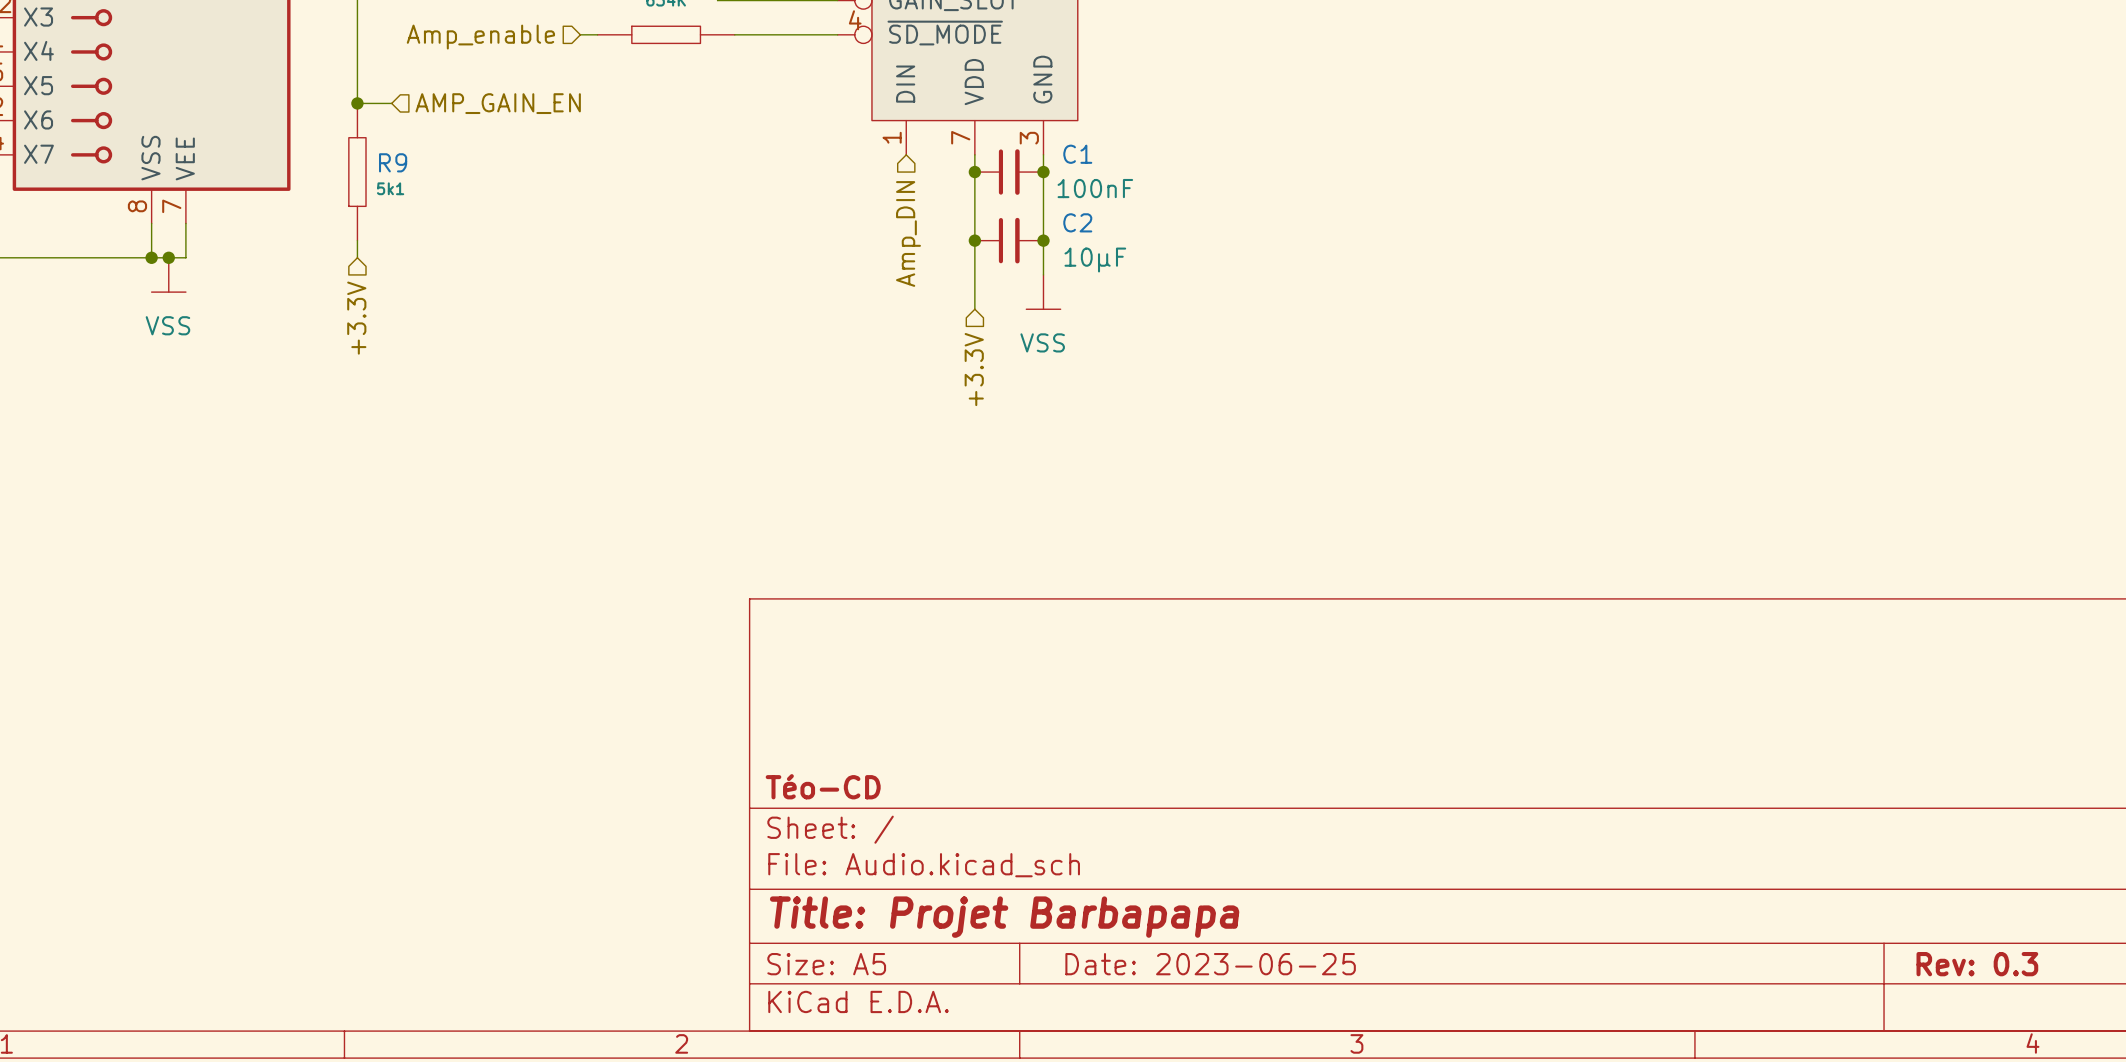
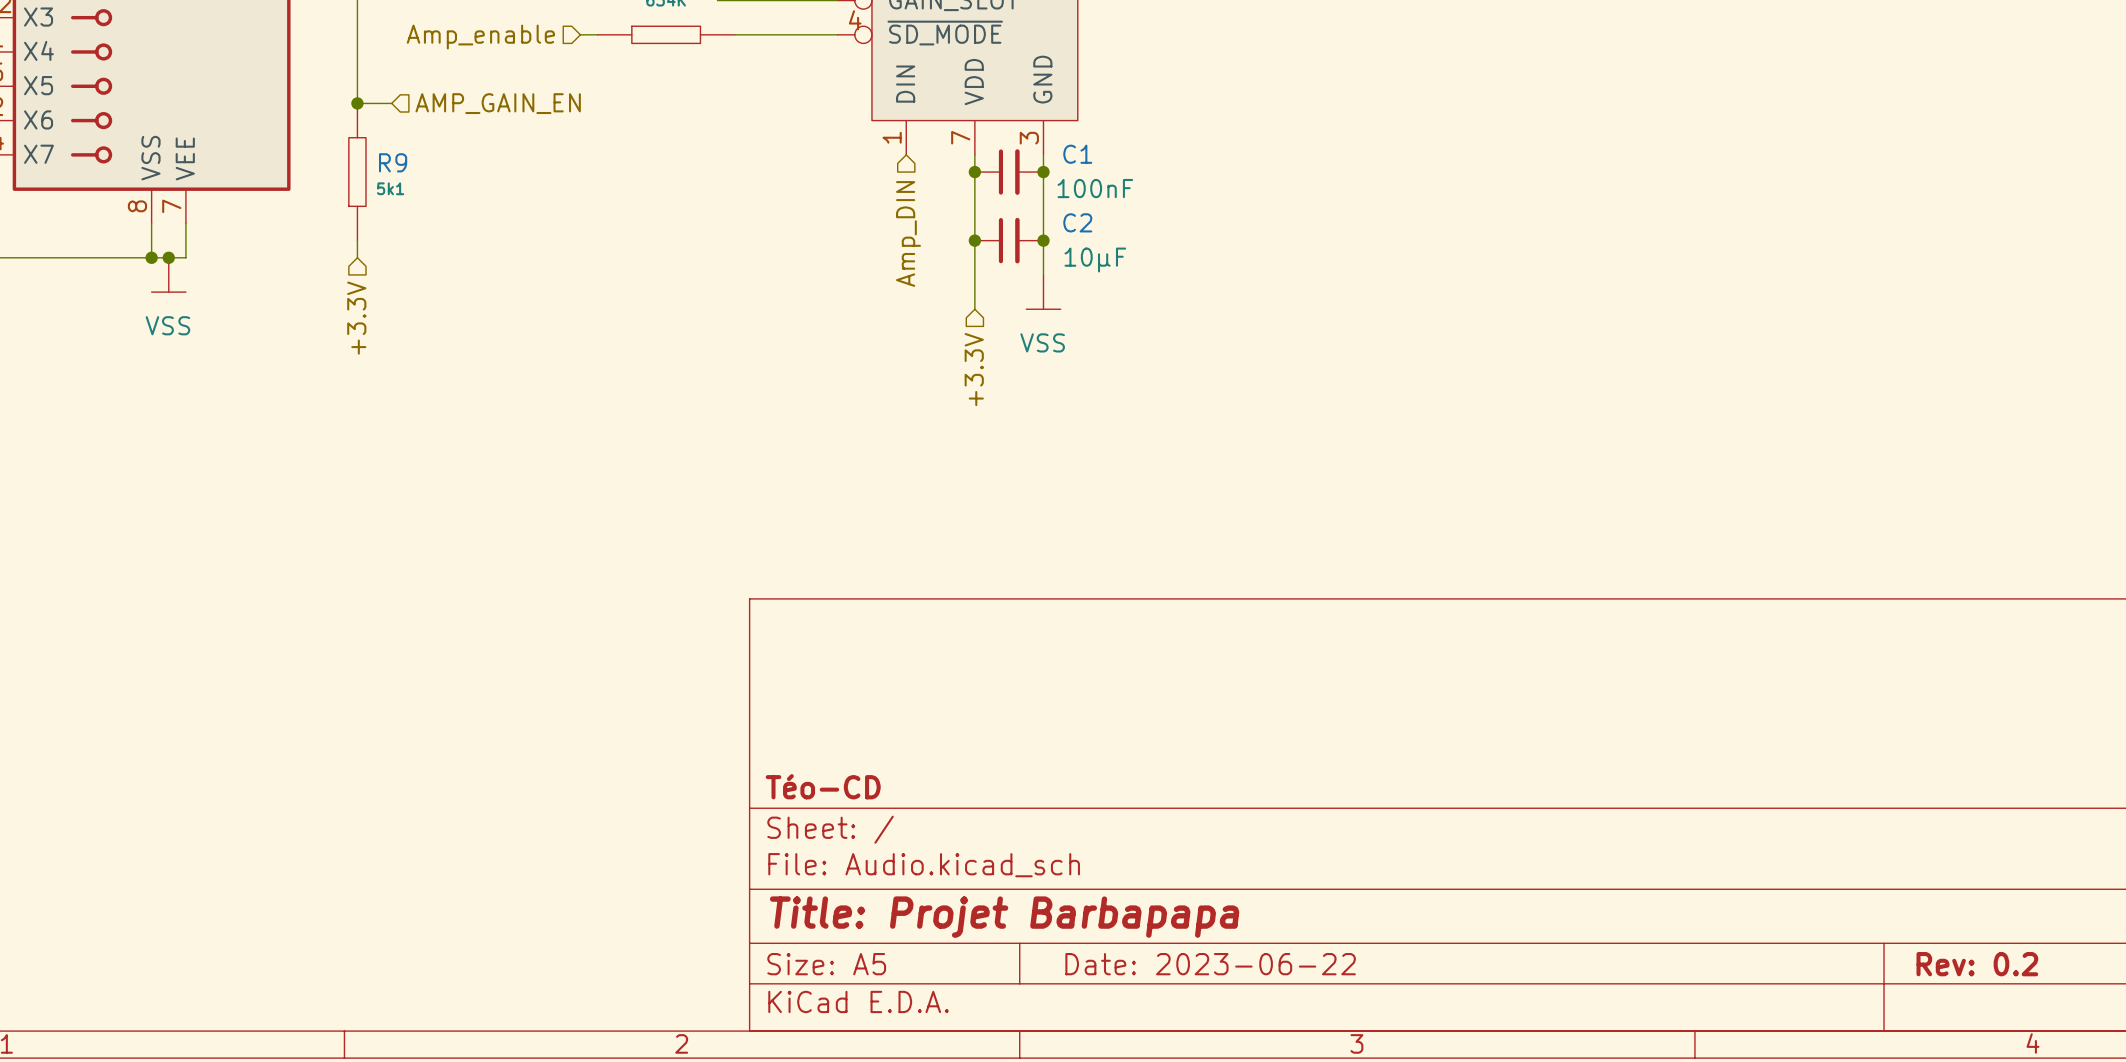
title block: Date: 2023-06-25 (1210, 964) -> Date: 2023-06-22 (1210, 964)
title block: Rev: 0.3 (1977, 964) -> Rev: 0.2 (1977, 964)

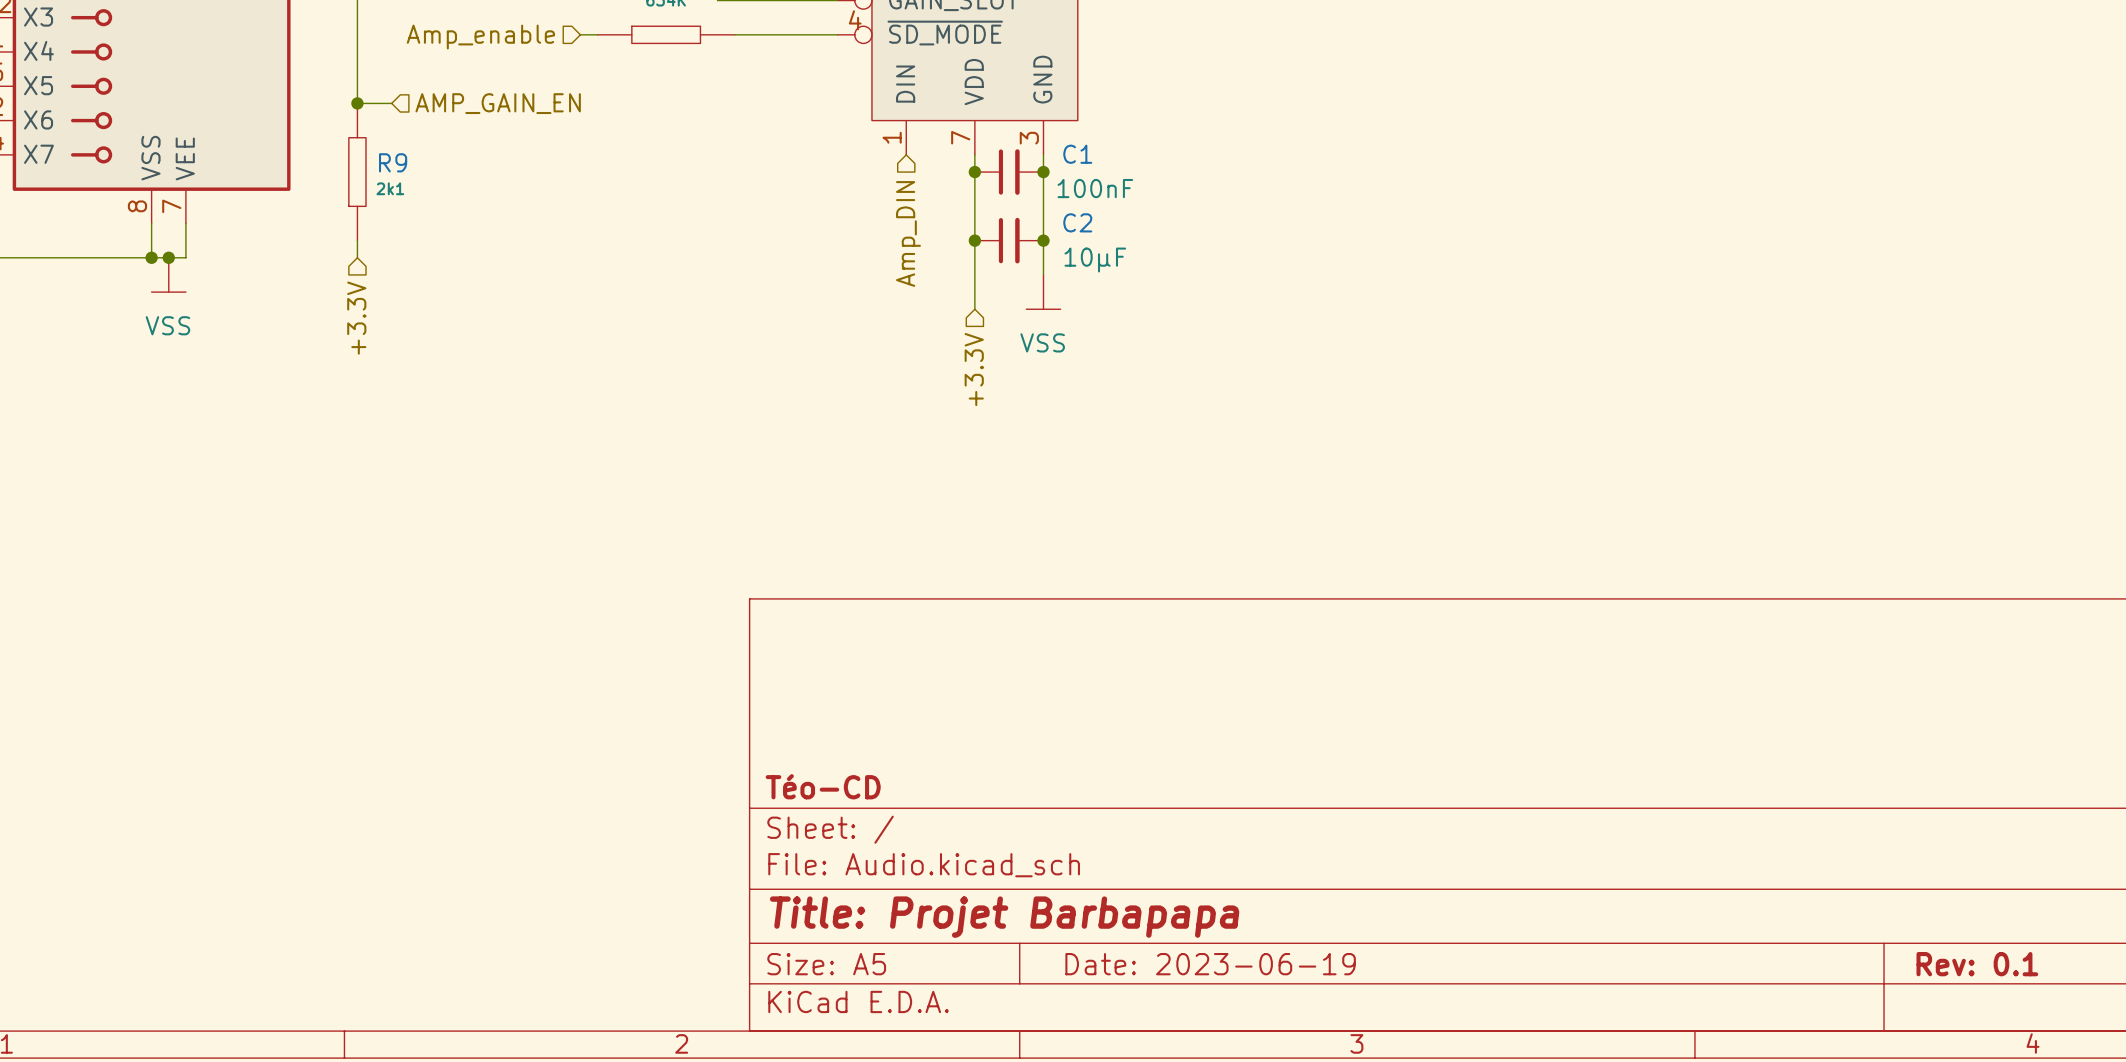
R9 text: 5k1 (390, 188) -> 2k1 (390, 188)
title block: Date: 2023-06-22 (1210, 964) -> Date: 2023-06-19 (1210, 964)
title block: Rev: 0.2 (1977, 964) -> Rev: 0.1 (1977, 964)

